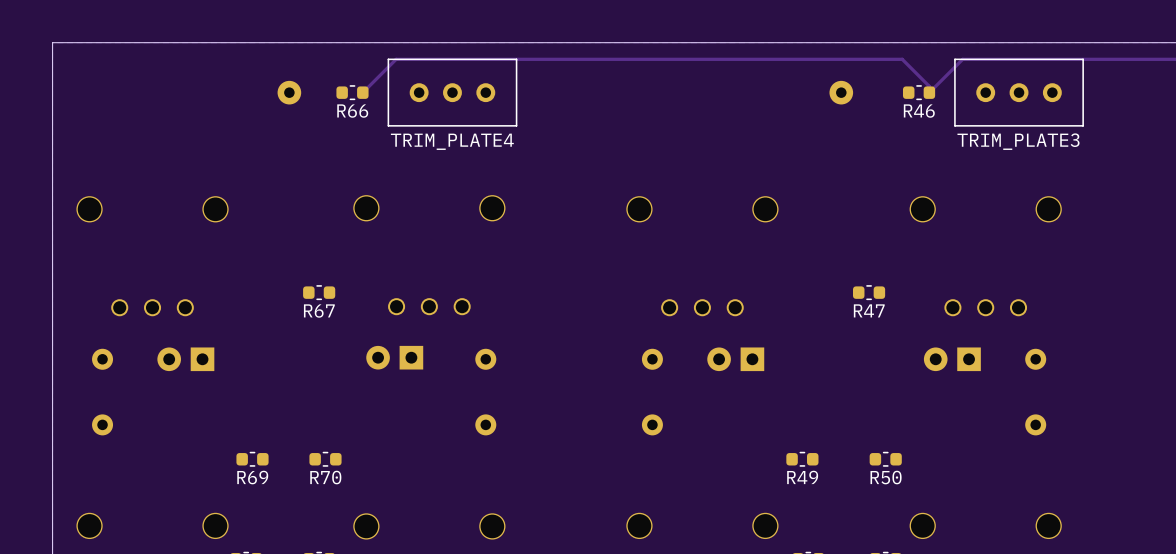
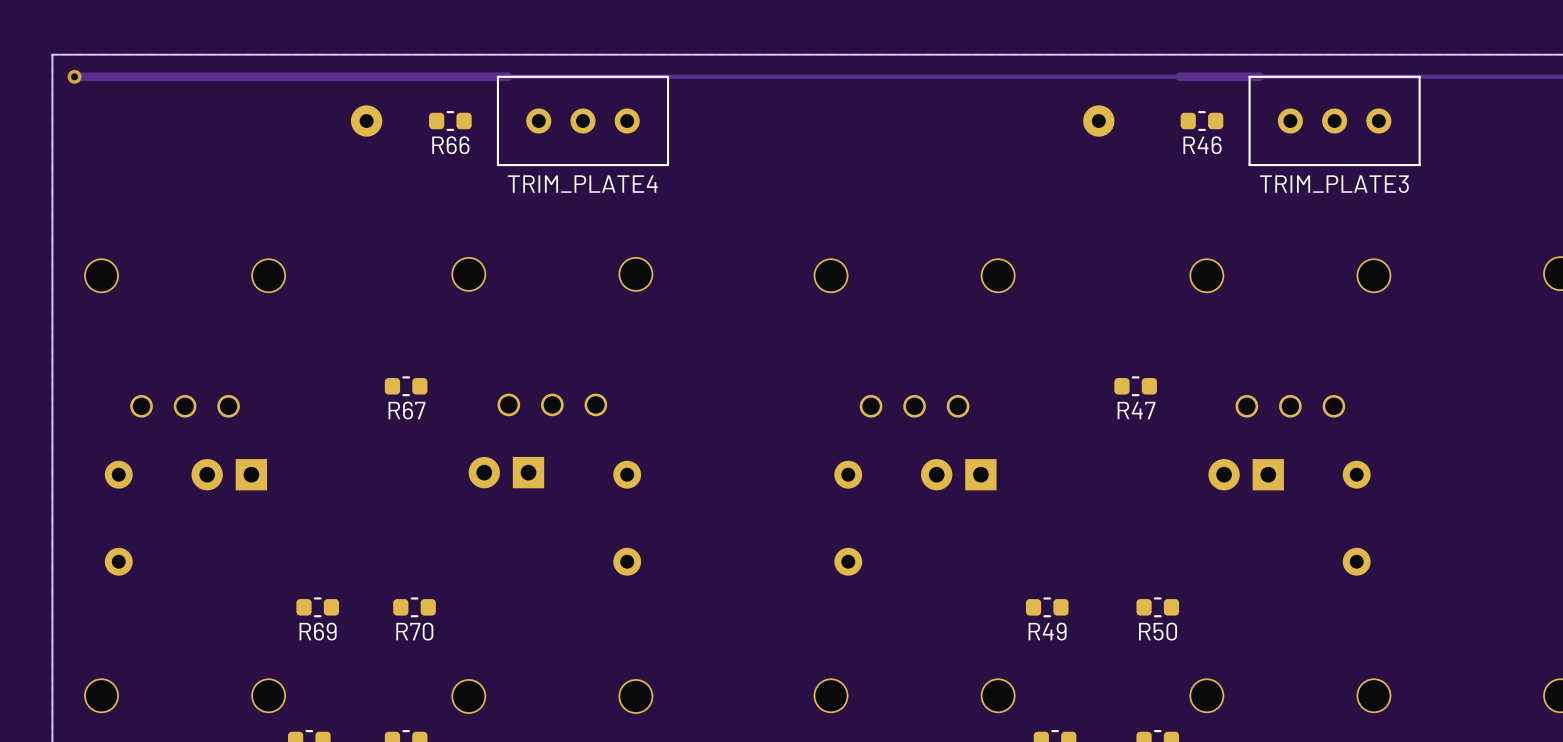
via: none -> (74, 76)
track: (396, 59) (362, 92) -> (508, 76) (74, 76)
track: (962, 59) (929, 92) (929, 86) (902, 59) -> (1259, 76) (1179, 76)

